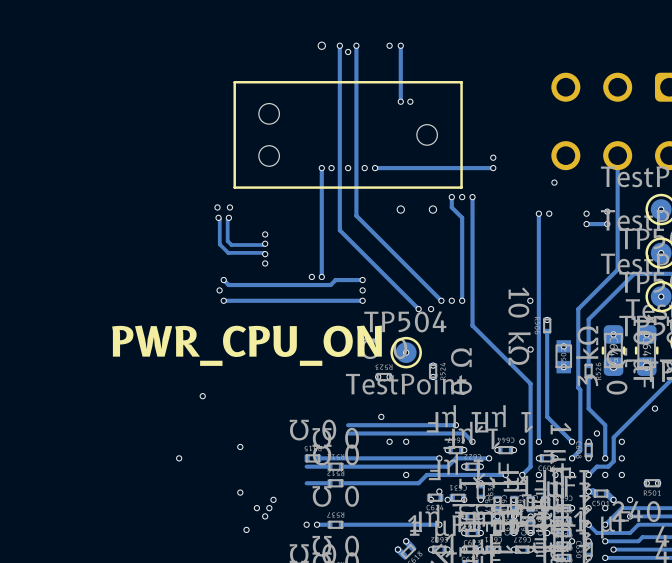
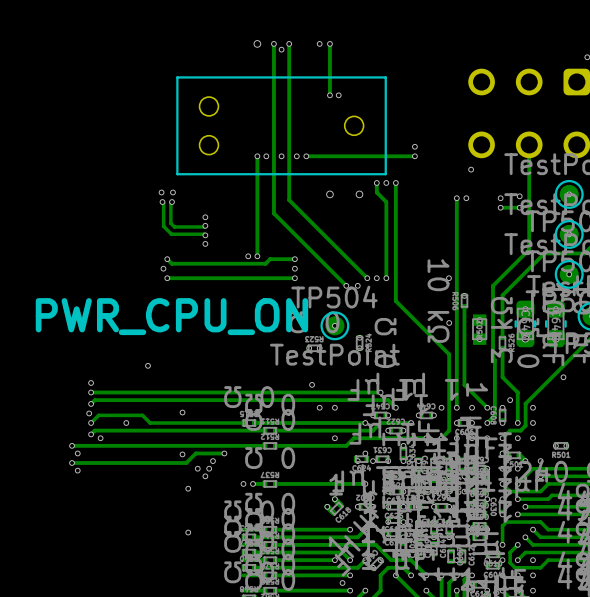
via: none -> (91, 382)
via: none -> (91, 392)
track: none -> (281, 392) (91, 392)
track: none -> (281, 400) (94, 400) (91, 403)
via: none -> (91, 403)
via: none -> (89, 413)
via: none -> (91, 422)
track: none -> (243, 422) (150, 422) (142, 415) (98, 415) (91, 422)
track: none -> (243, 430) (94, 430) (91, 434)
via: none -> (91, 434)
via: none -> (100, 438)
via: none -> (72, 445)
track: none -> (243, 445) (72, 445)
via: none -> (77, 453)
track: none -> (224, 453) (195, 453) (186, 462) (72, 462)
via: none -> (224, 453)
via: none -> (72, 462)
via: none -> (77, 470)

